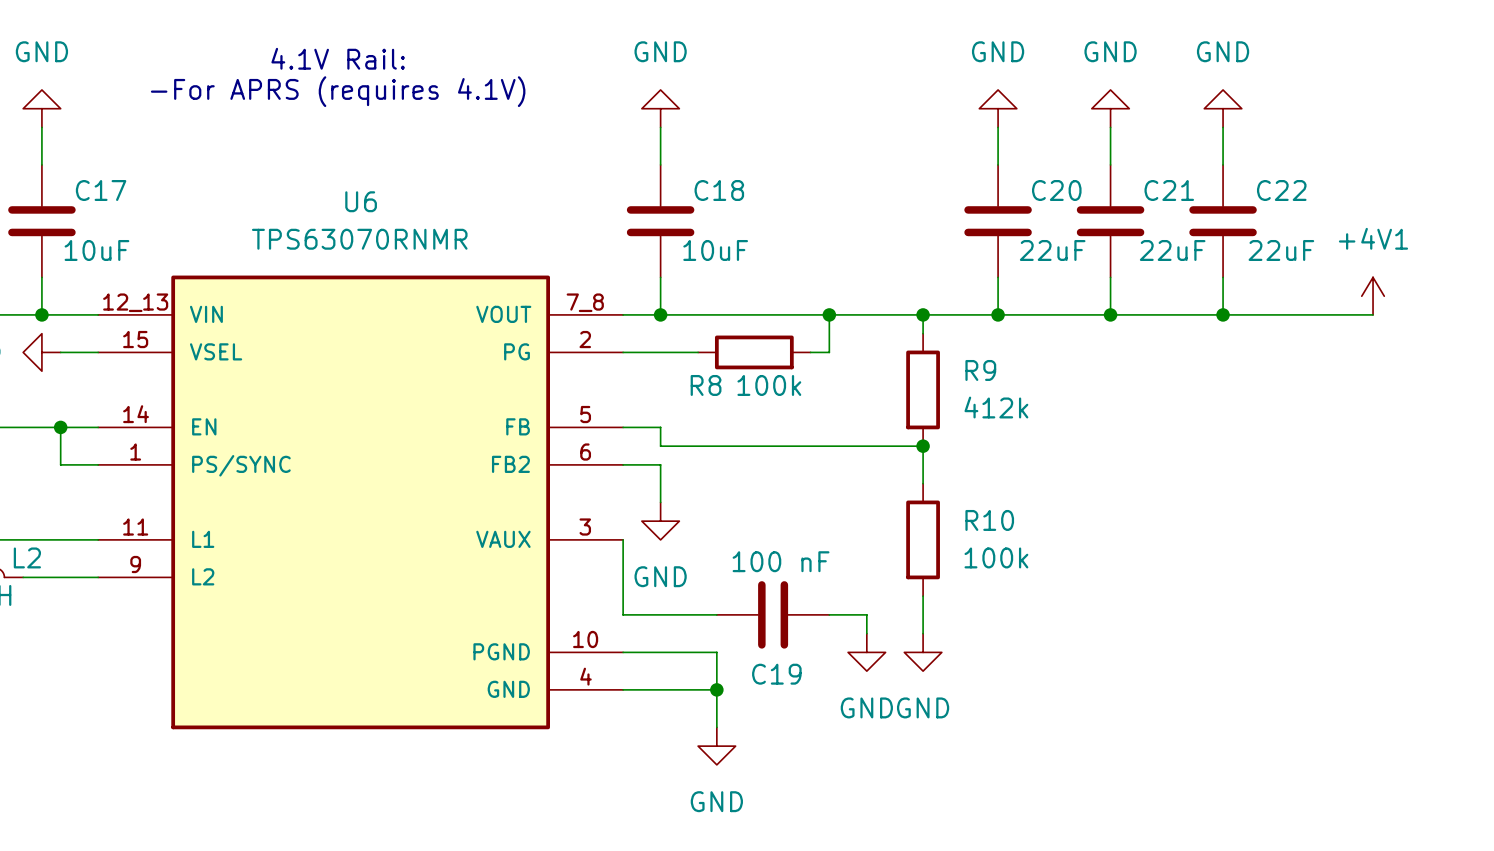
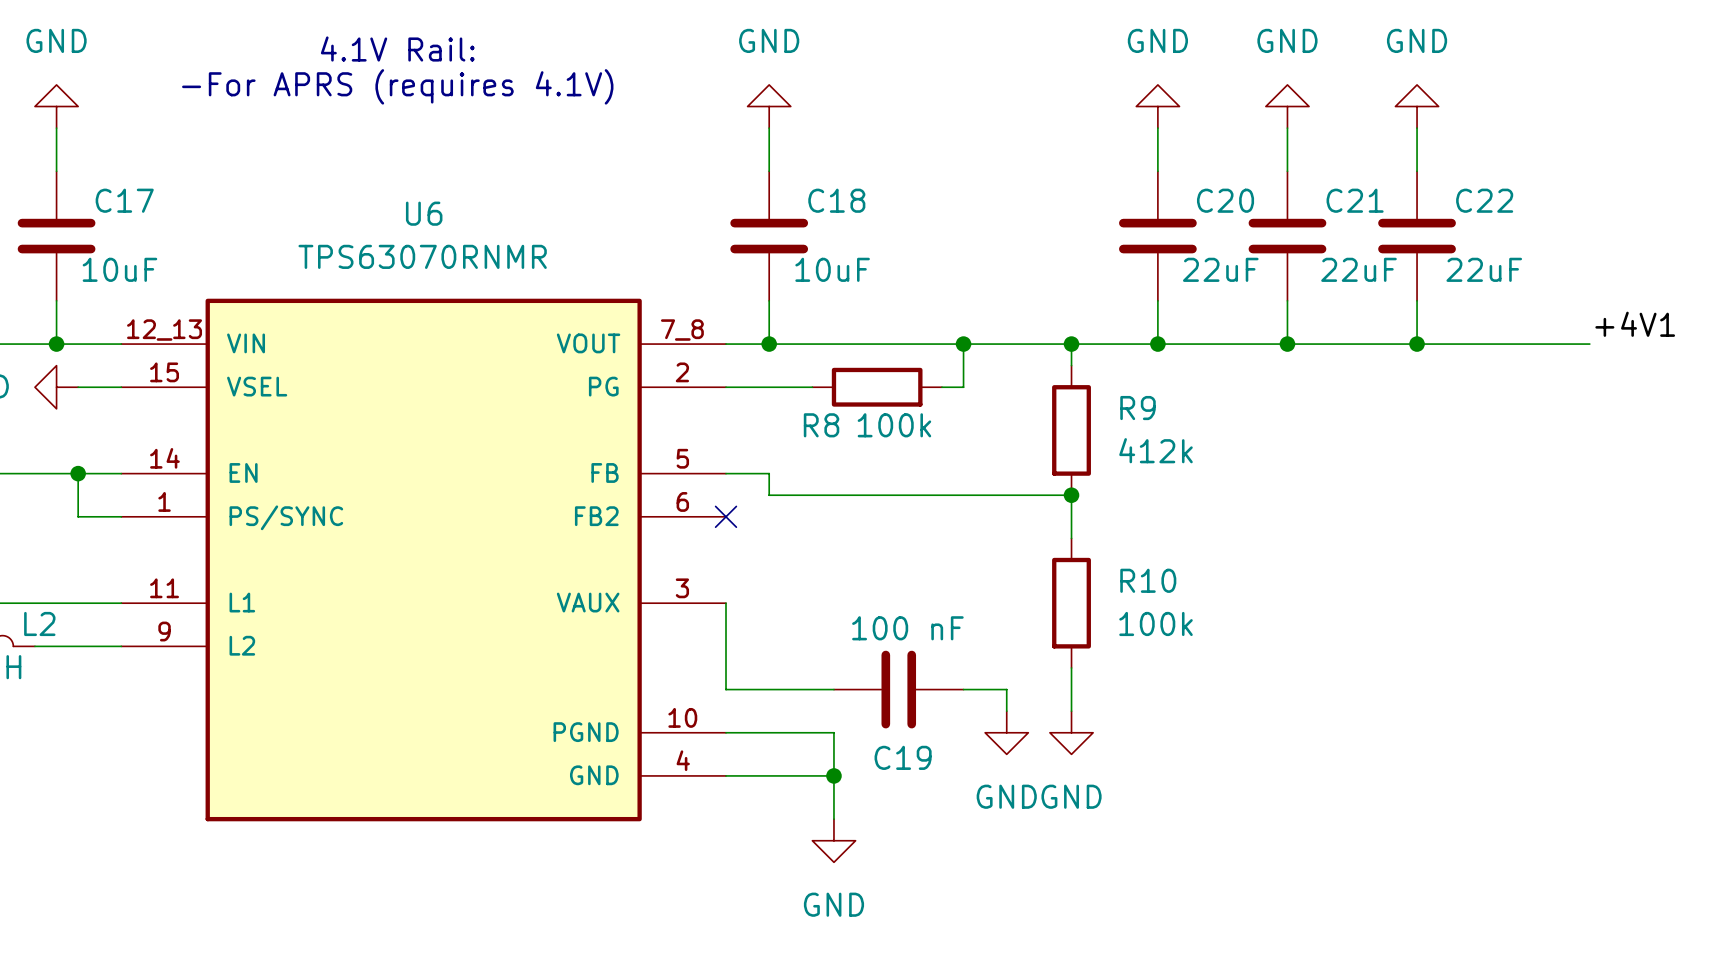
power symbol: +4V1 (1373, 296) -> none
label: none -> +4V1 (1635, 324)
wire: (623, 464) (660, 464) (660, 502) -> none
no-connect mark: none -> (726, 516)
power symbol: GND (660, 521) -> none

